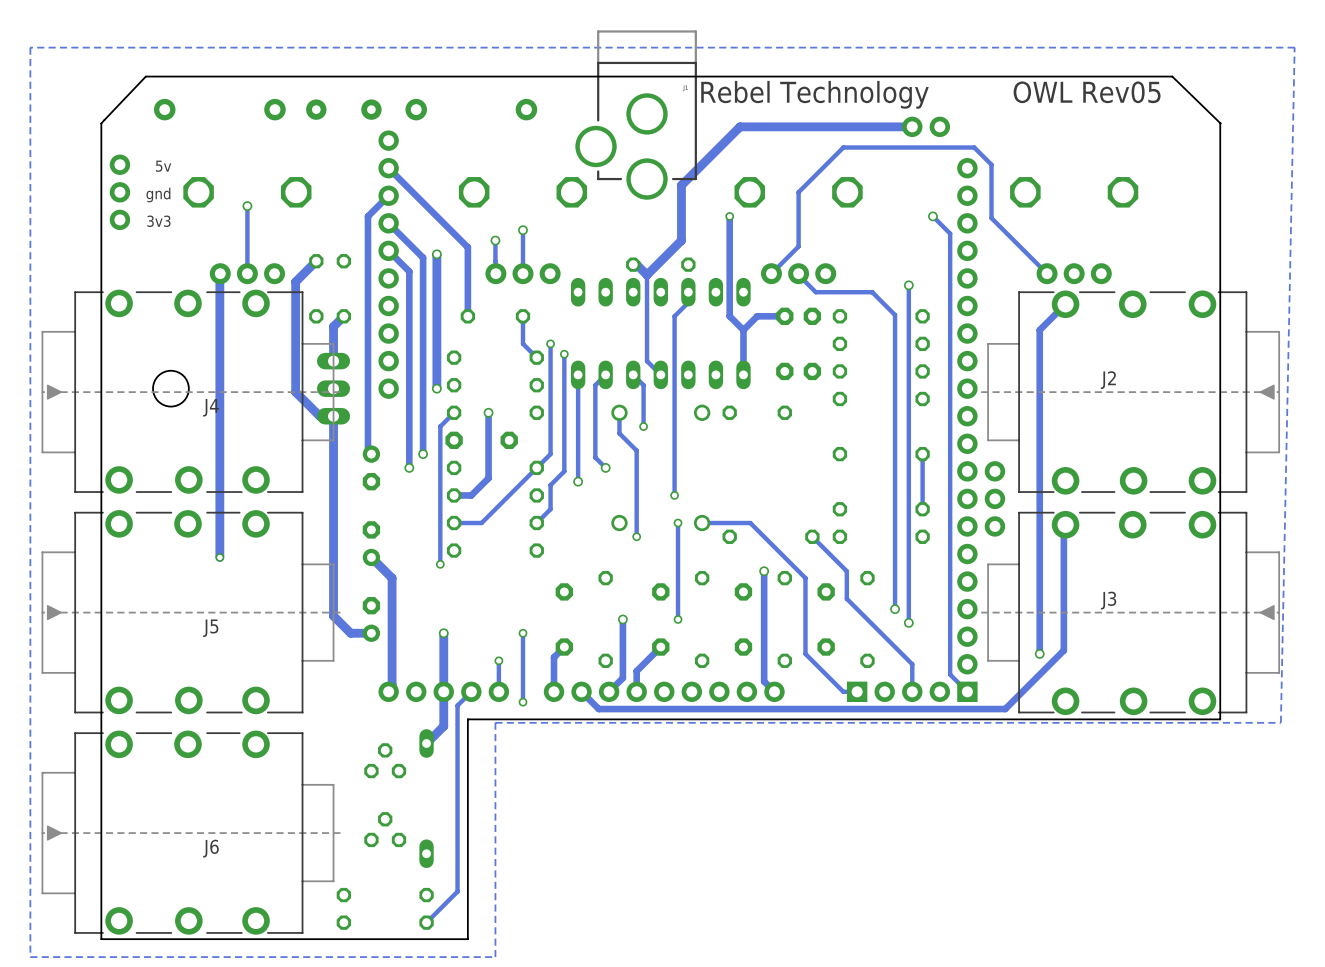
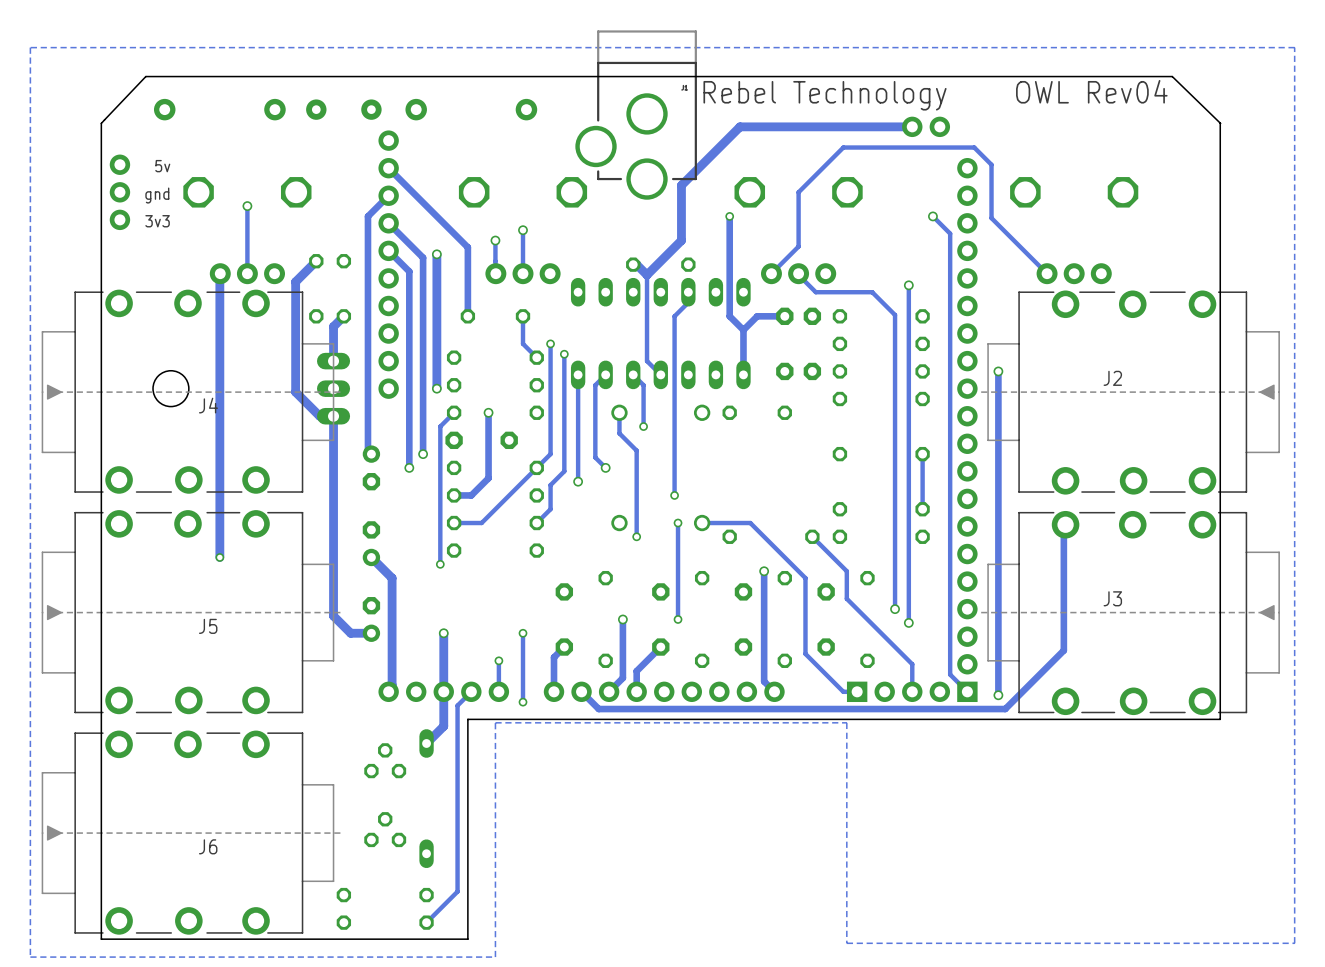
zone outline: (1294, 47) (1280, 722) (846, 722) -> (1294, 47) (1294, 943) (846, 943) (846, 722)
text: OWL Rev05 (1087, 92) -> OWL Rev04 (1091, 91)
track: (1065, 304) (1039, 330) (1039, 653) -> none
track: none -> (998, 371) (998, 695)
via: none -> (998, 371)
part: (994, 498) -> none
via position: (1039, 653) -> (998, 695)

